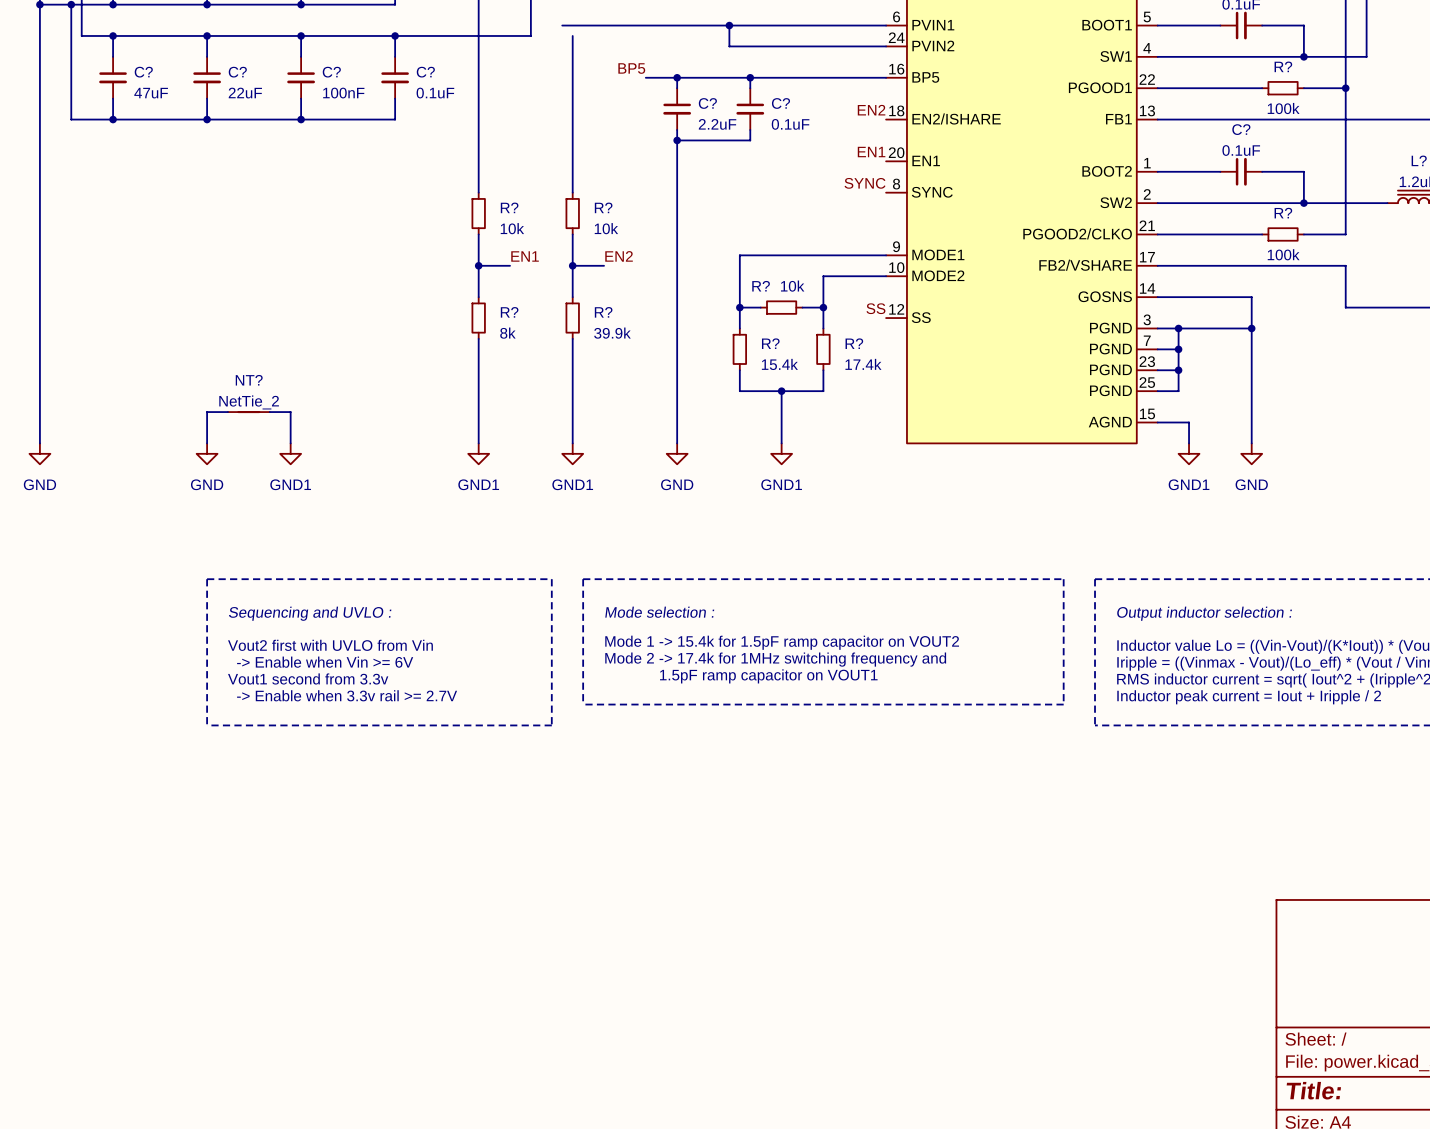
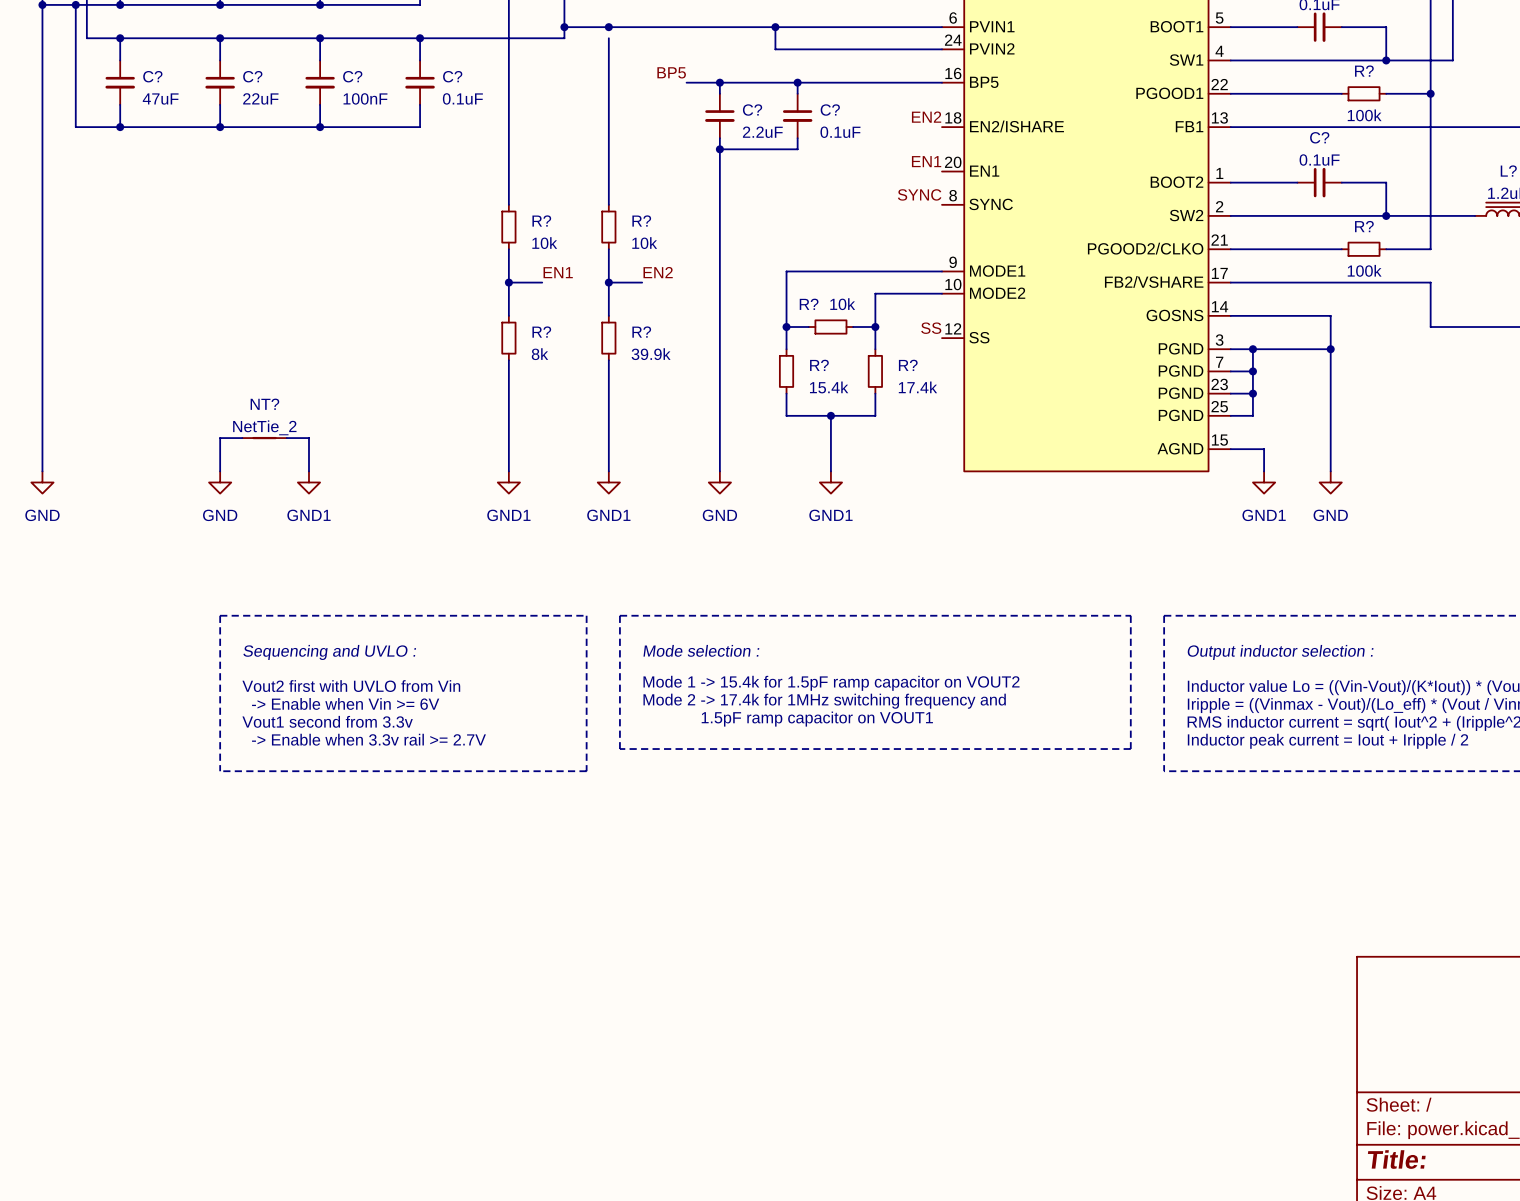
wire: none -> (564, 27) (597, 27)
junction: none -> (564, 27)
junction: none -> (608, 27)

